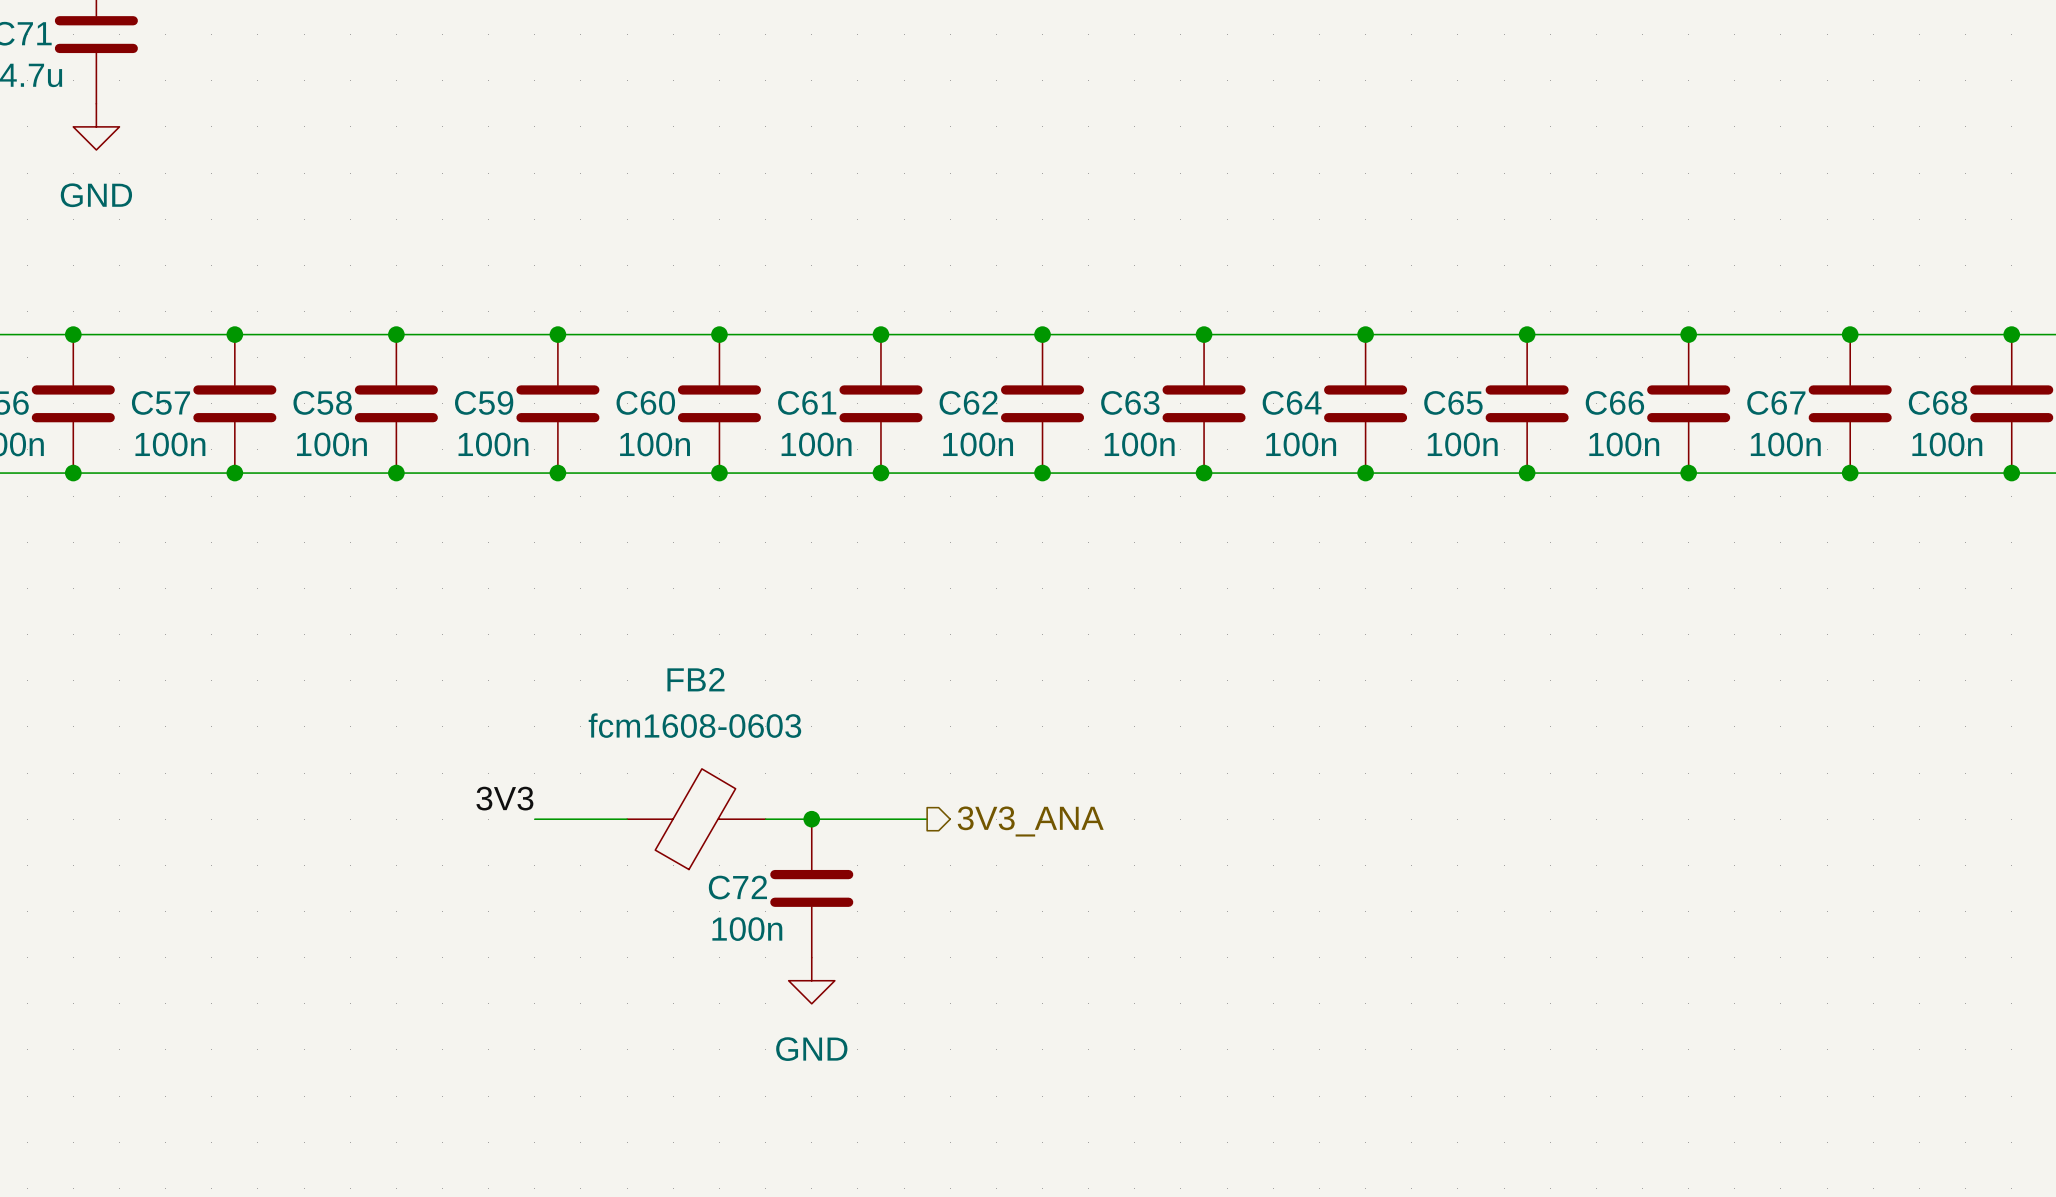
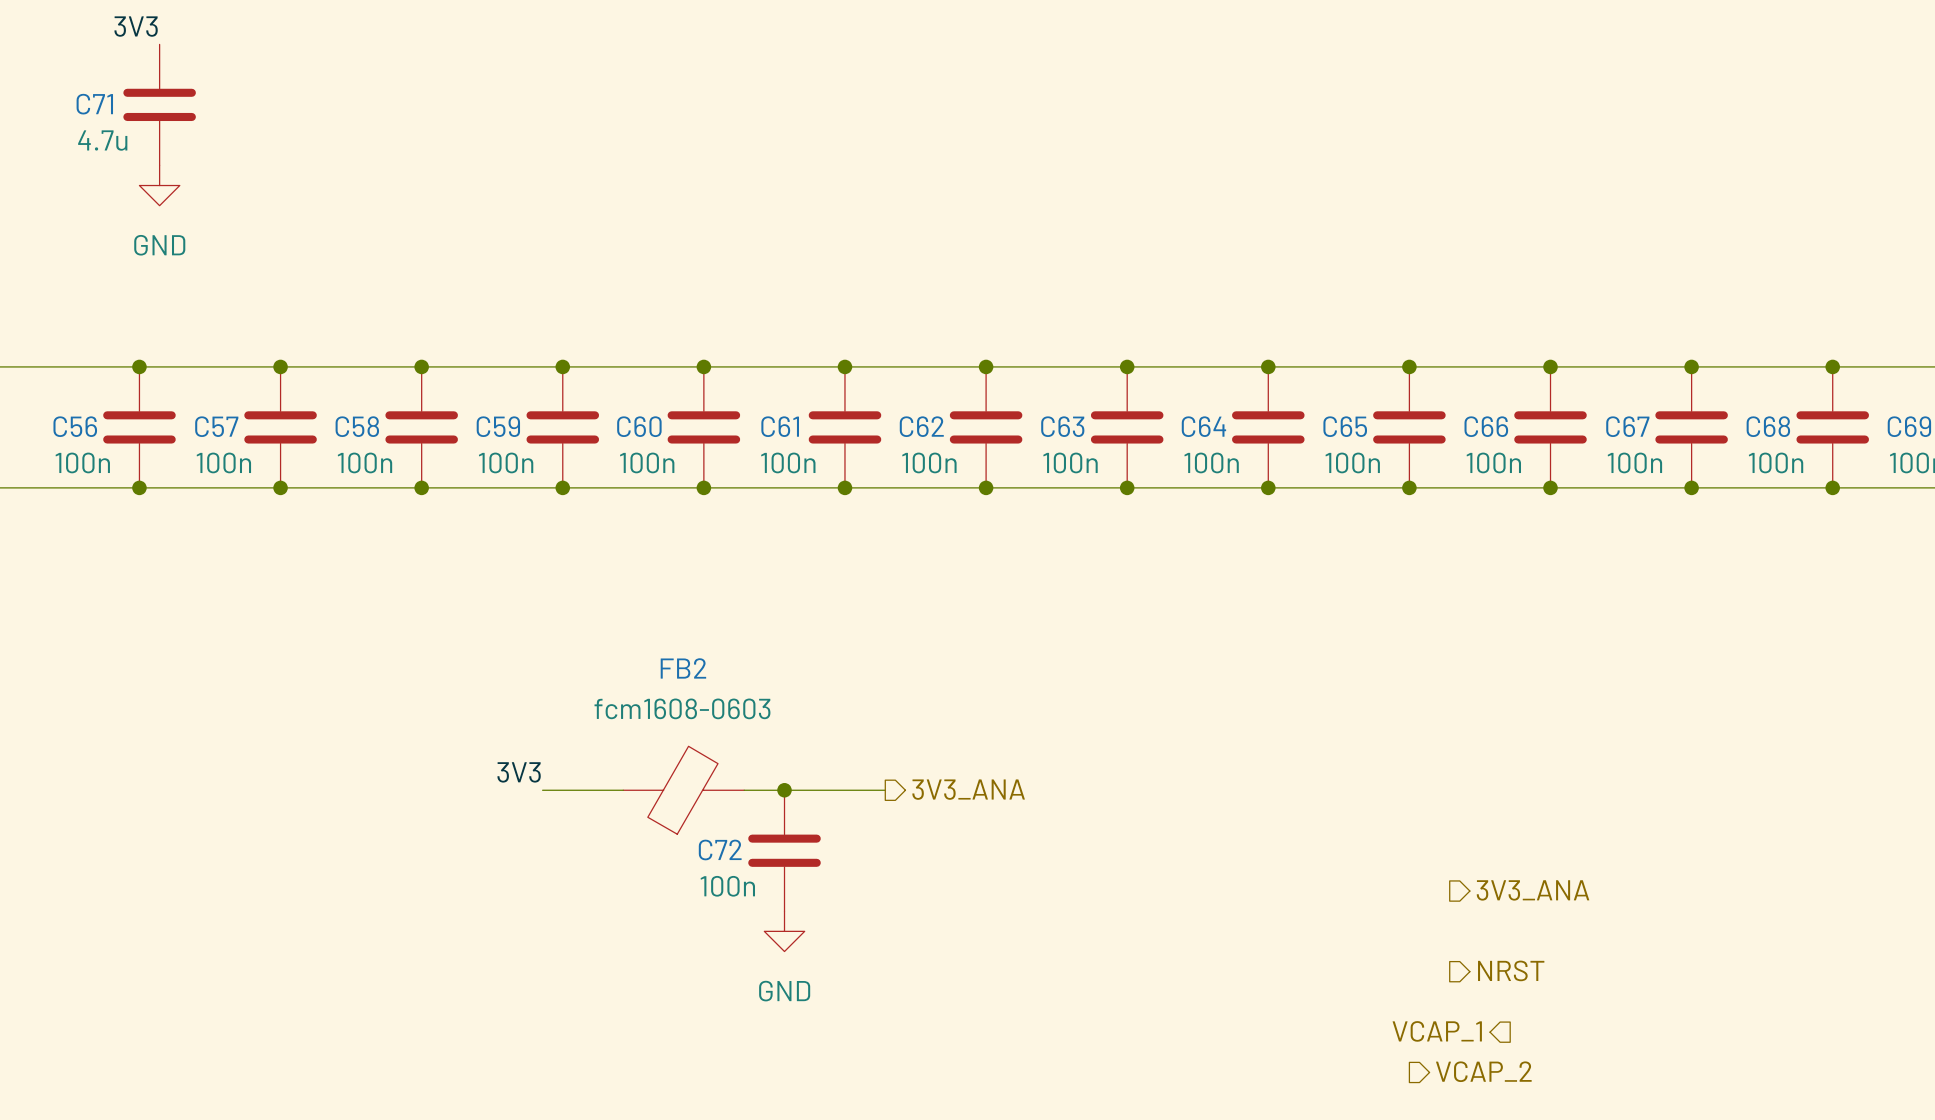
hierarchical label: none -> 3V3_ANA (1533, 890)
hierarchical label: none -> NRST (1511, 970)
hierarchical label: none -> VCAP_1 (1437, 1031)
hierarchical label: none -> VCAP_2 (1483, 1071)

